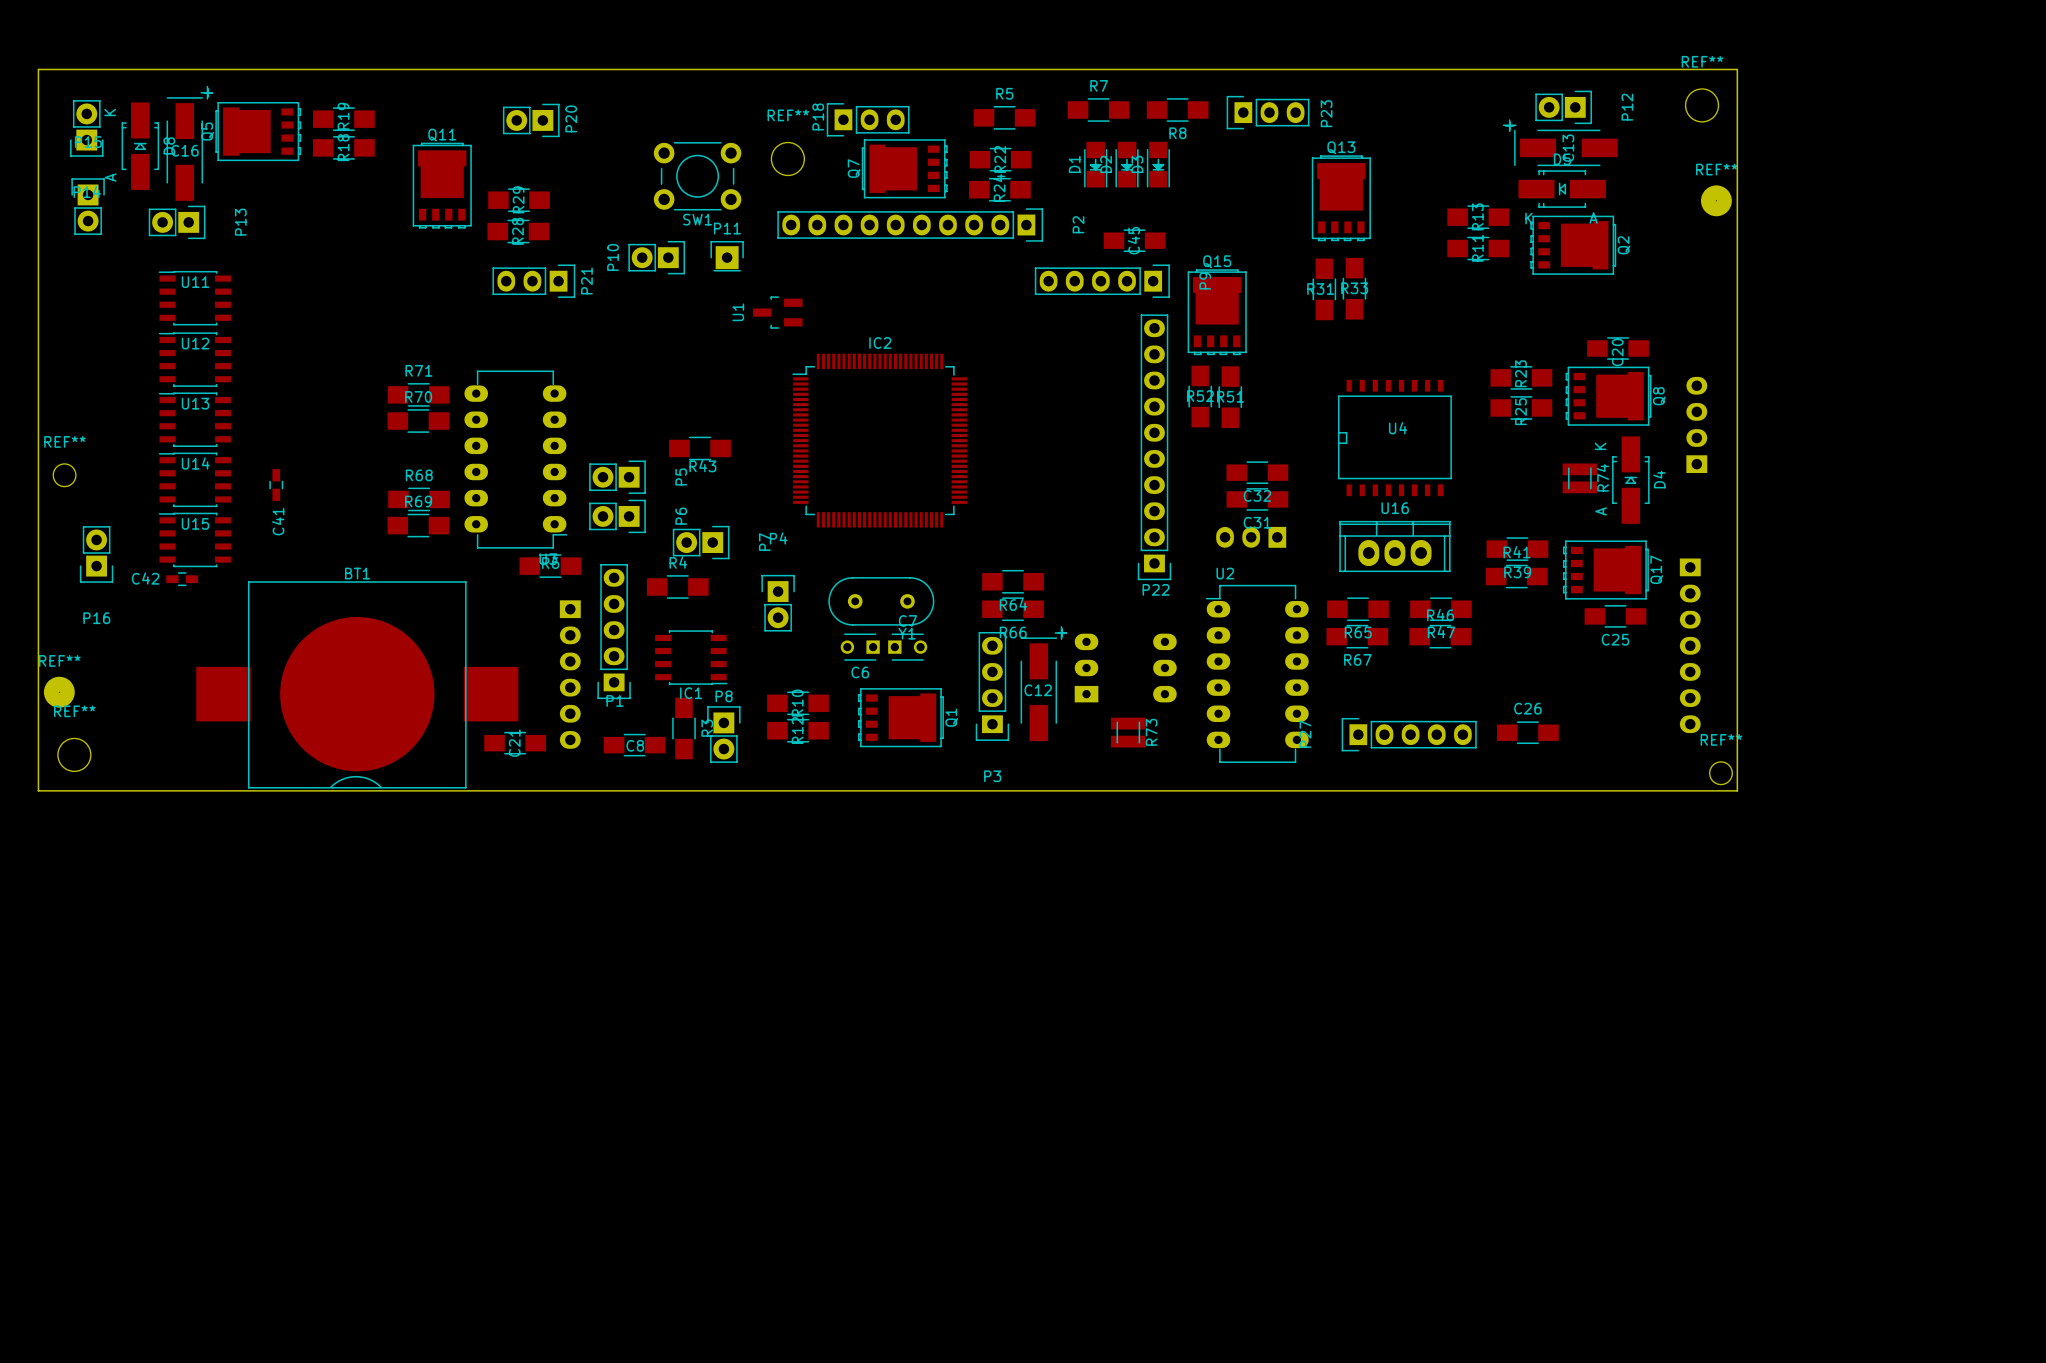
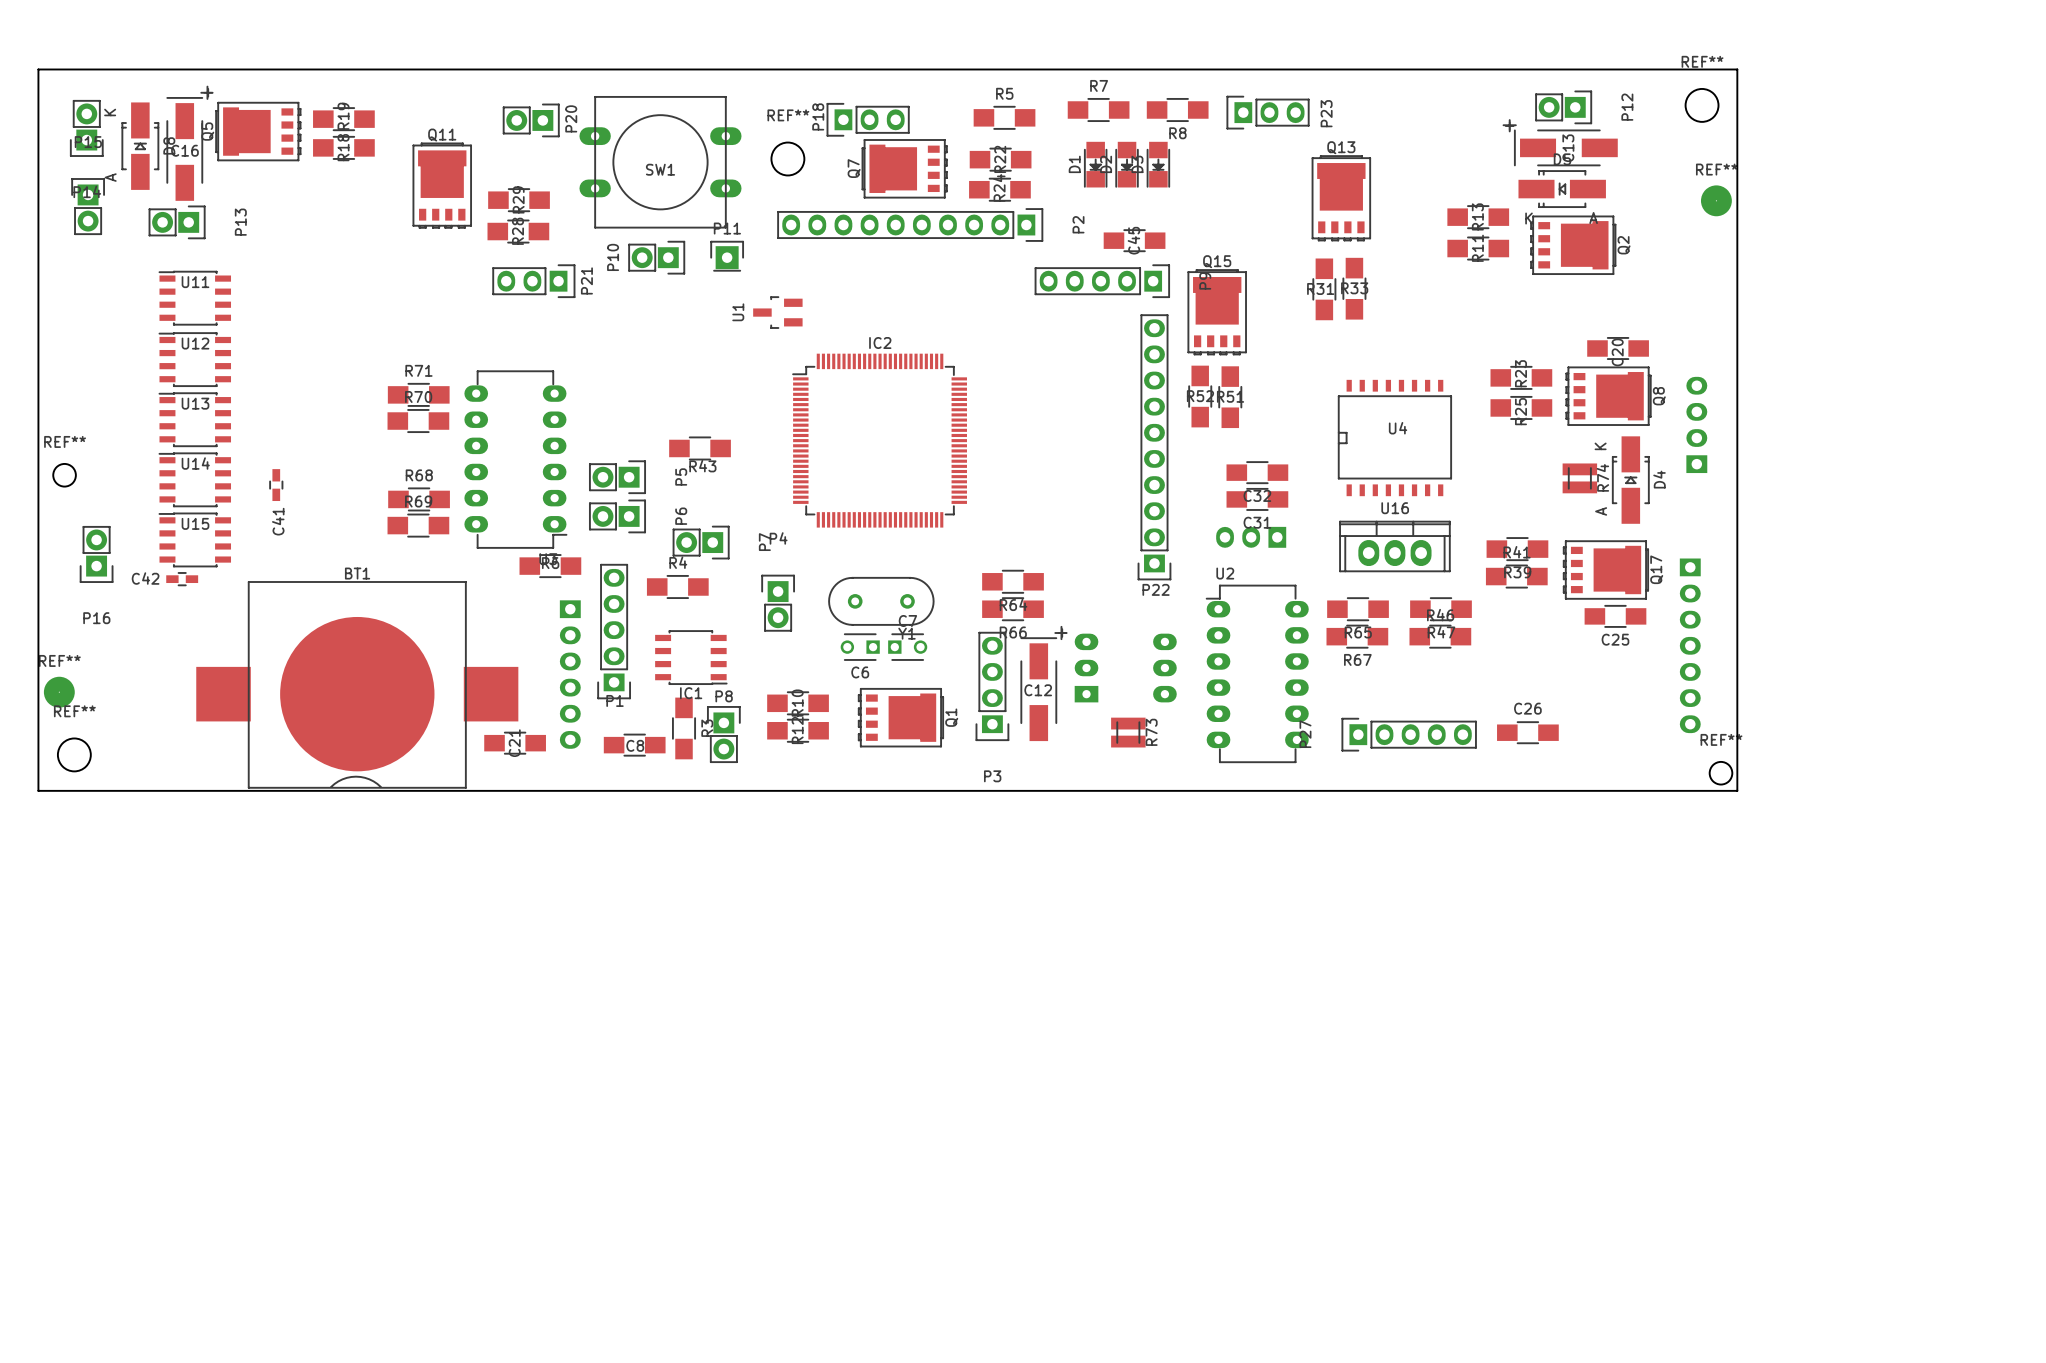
SW1 footprint: [653, 142, 742, 211] -> [579, 96, 742, 229]
SW1 name position: SW1 (697, 219) -> SW1 (660, 169)

